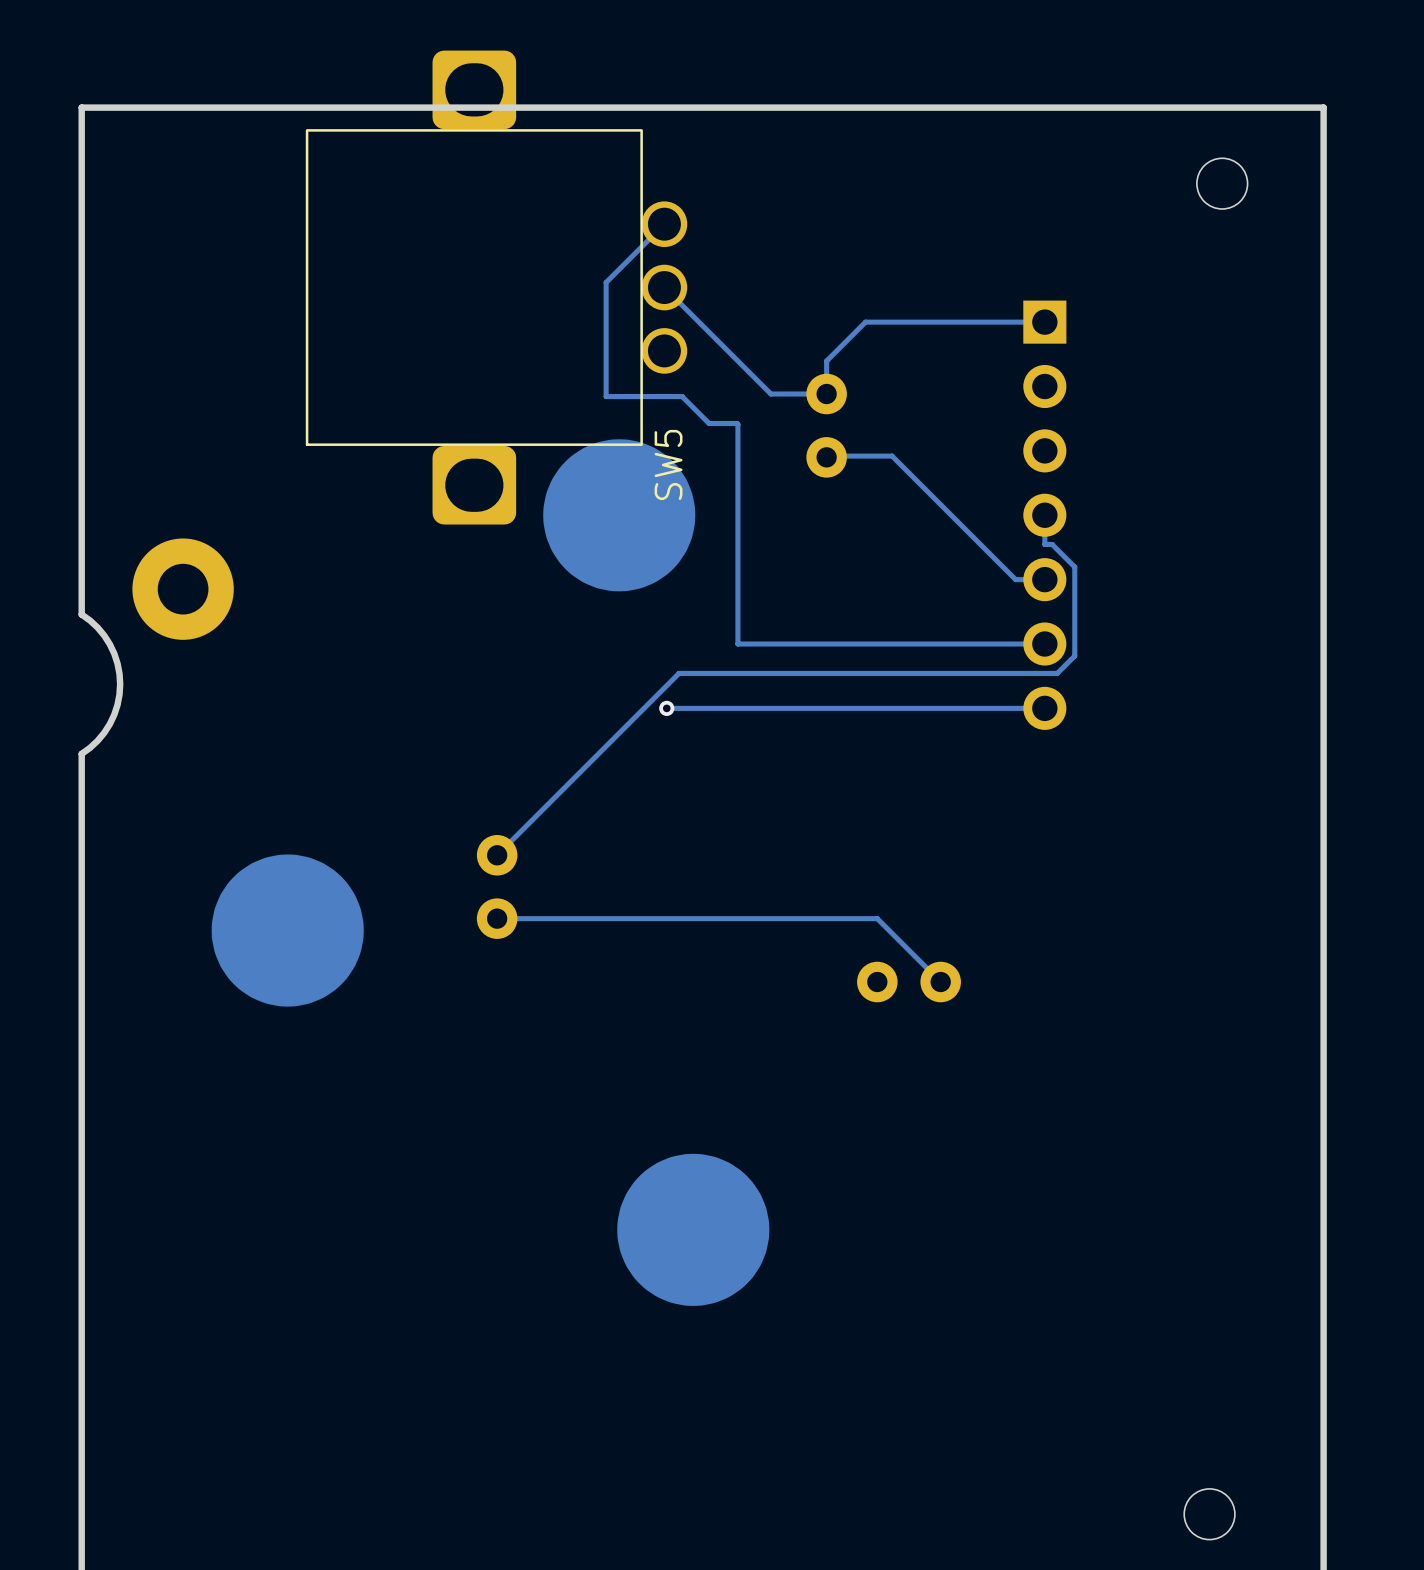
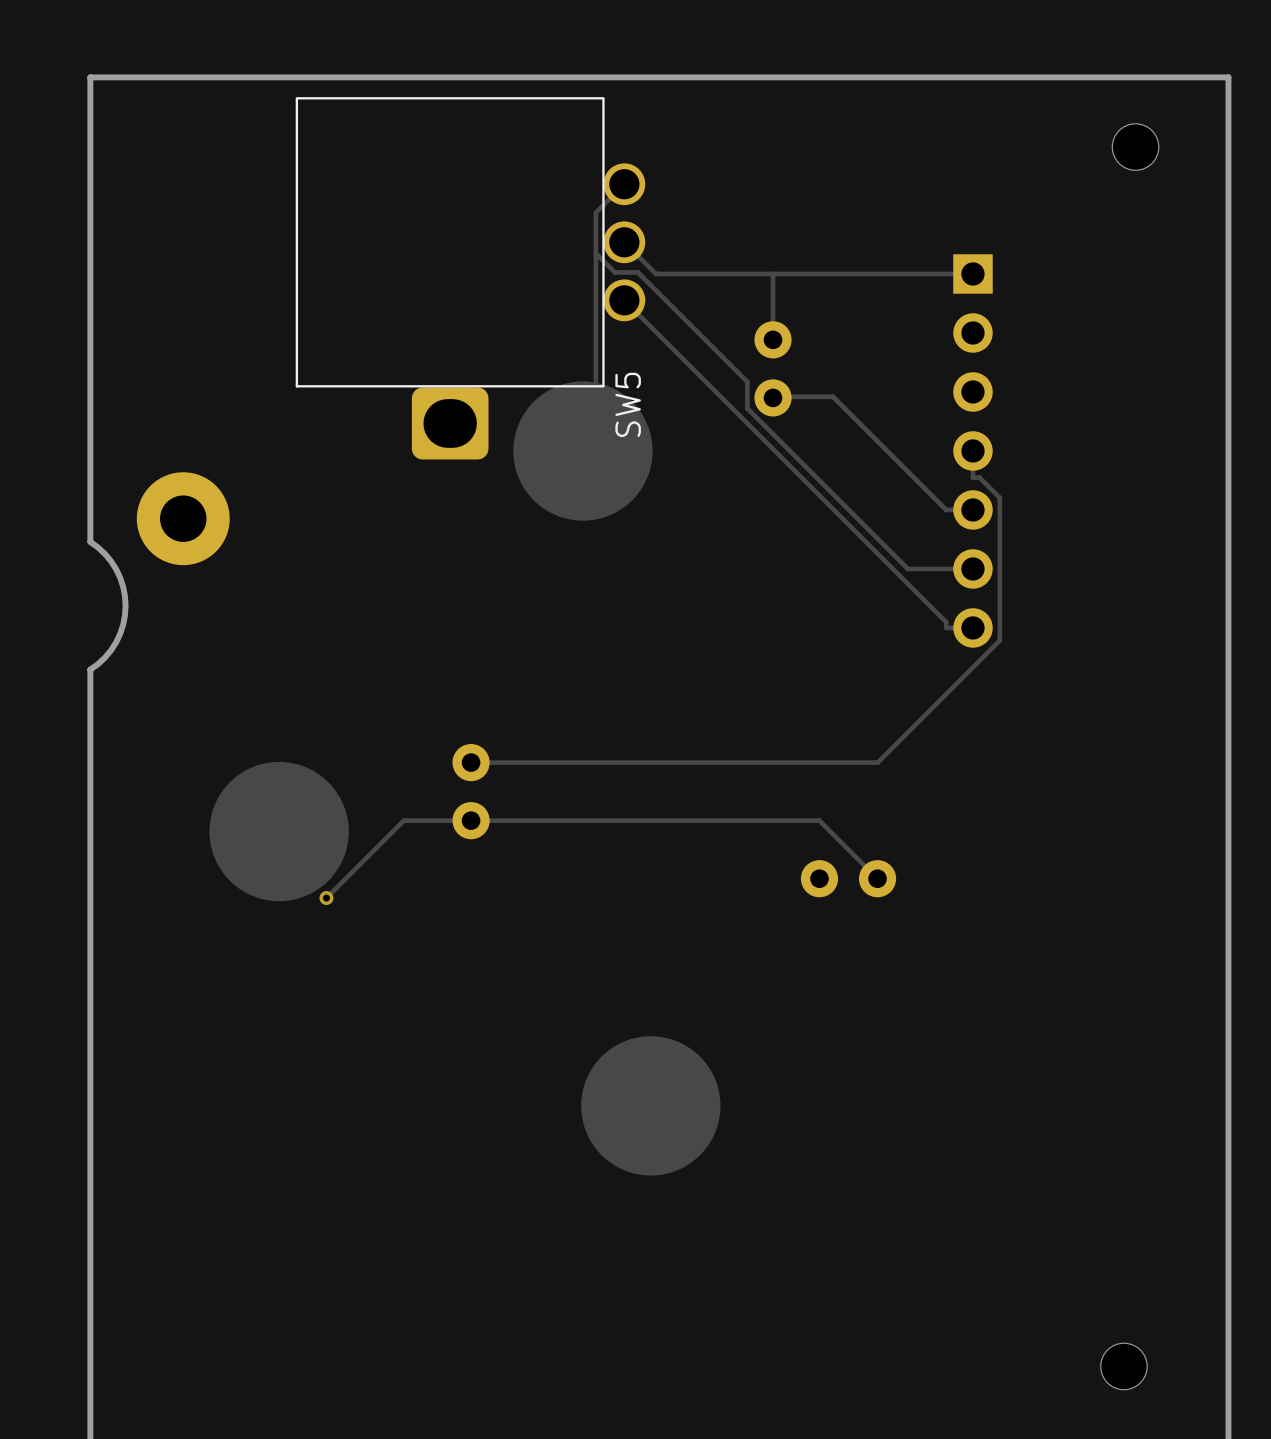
SW5 footprint: [305, 50, 688, 525] -> [295, 97, 646, 460]
track: (664, 224) (606, 282) (606, 396) (682, 396) (709, 423) (737, 424) (737, 644) (973, 644) -> (595, 253) (614, 272) (637, 272) (747, 381) (747, 408) (907, 568)
track: none -> (624, 184) (595, 212) (595, 429) (617, 451)
track: (699, 322) (770, 394) (826, 394) -> (656, 273) (808, 273)
track: (865, 322) (826, 361) -> (773, 273) (773, 309)
track: (1074, 566) (1074, 655) (1057, 673) (679, 673) (497, 855) -> (999, 497) (999, 640) (877, 762) (471, 762)
via: (666, 708) -> none
track: (1015, 708) (666, 708) -> (946, 627) (946, 622) (624, 300)
track: none -> (471, 820) (403, 820) (326, 898)
via: none -> (326, 898)

